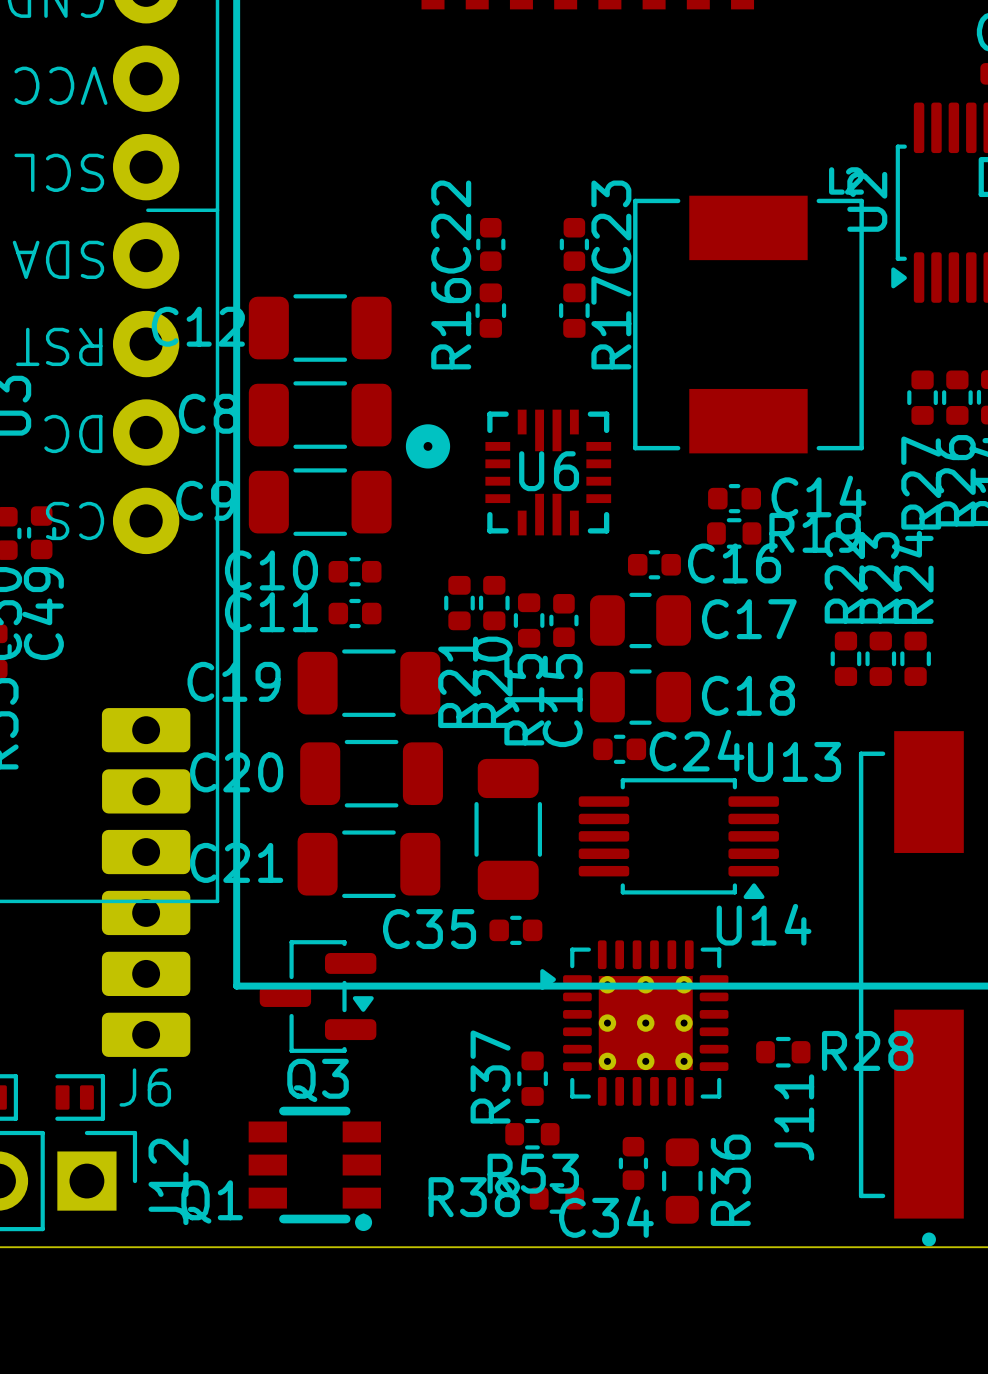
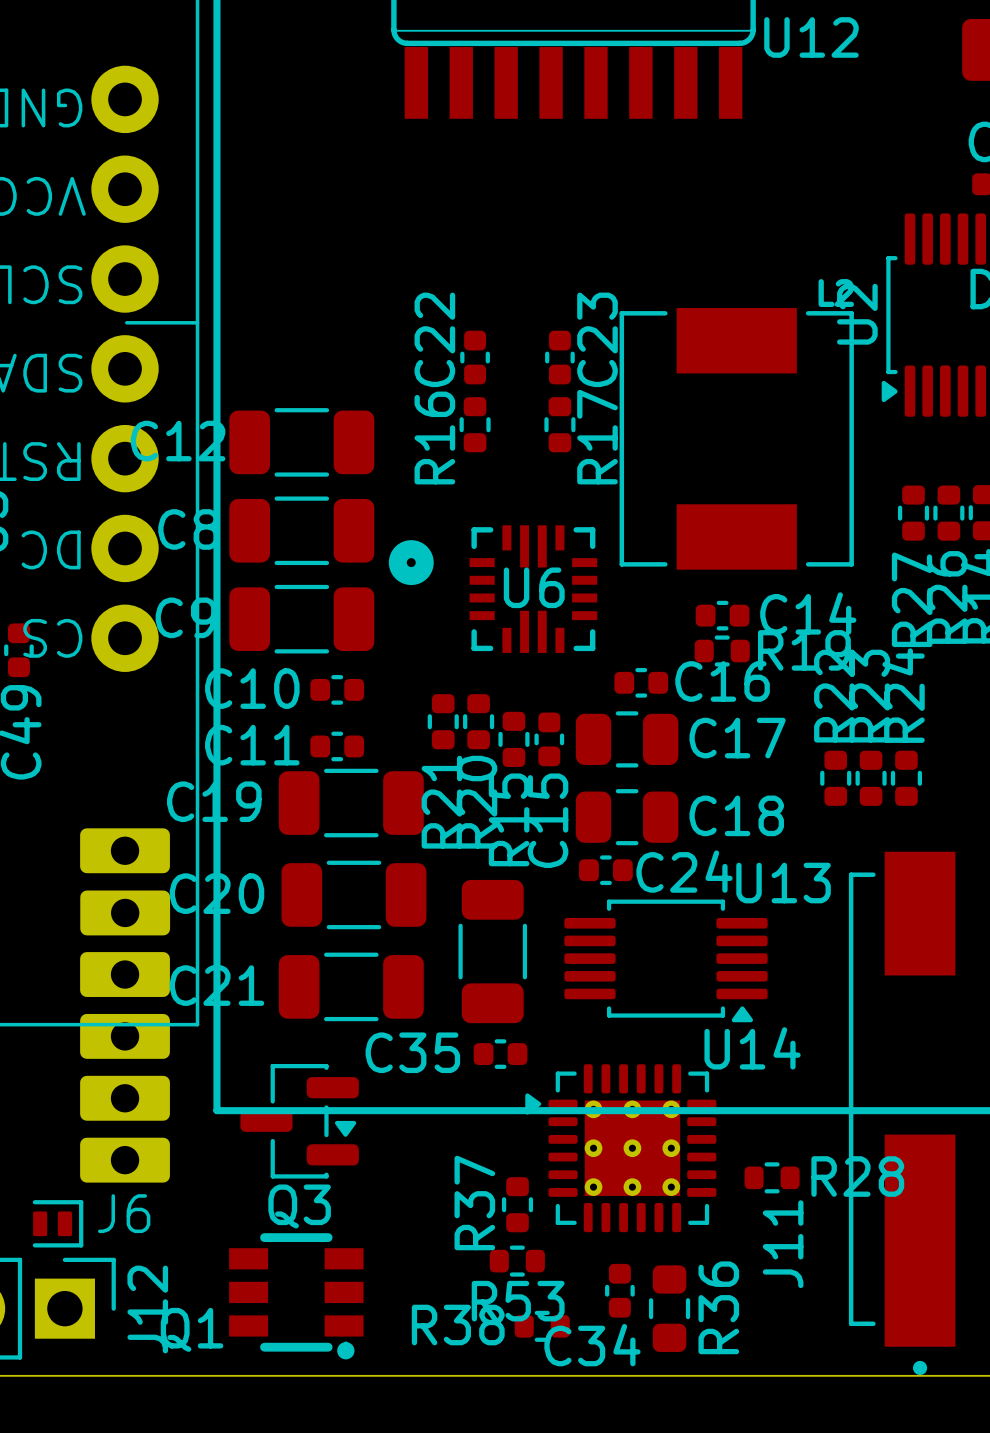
C11 position: (355, 613) -> (337, 746)

